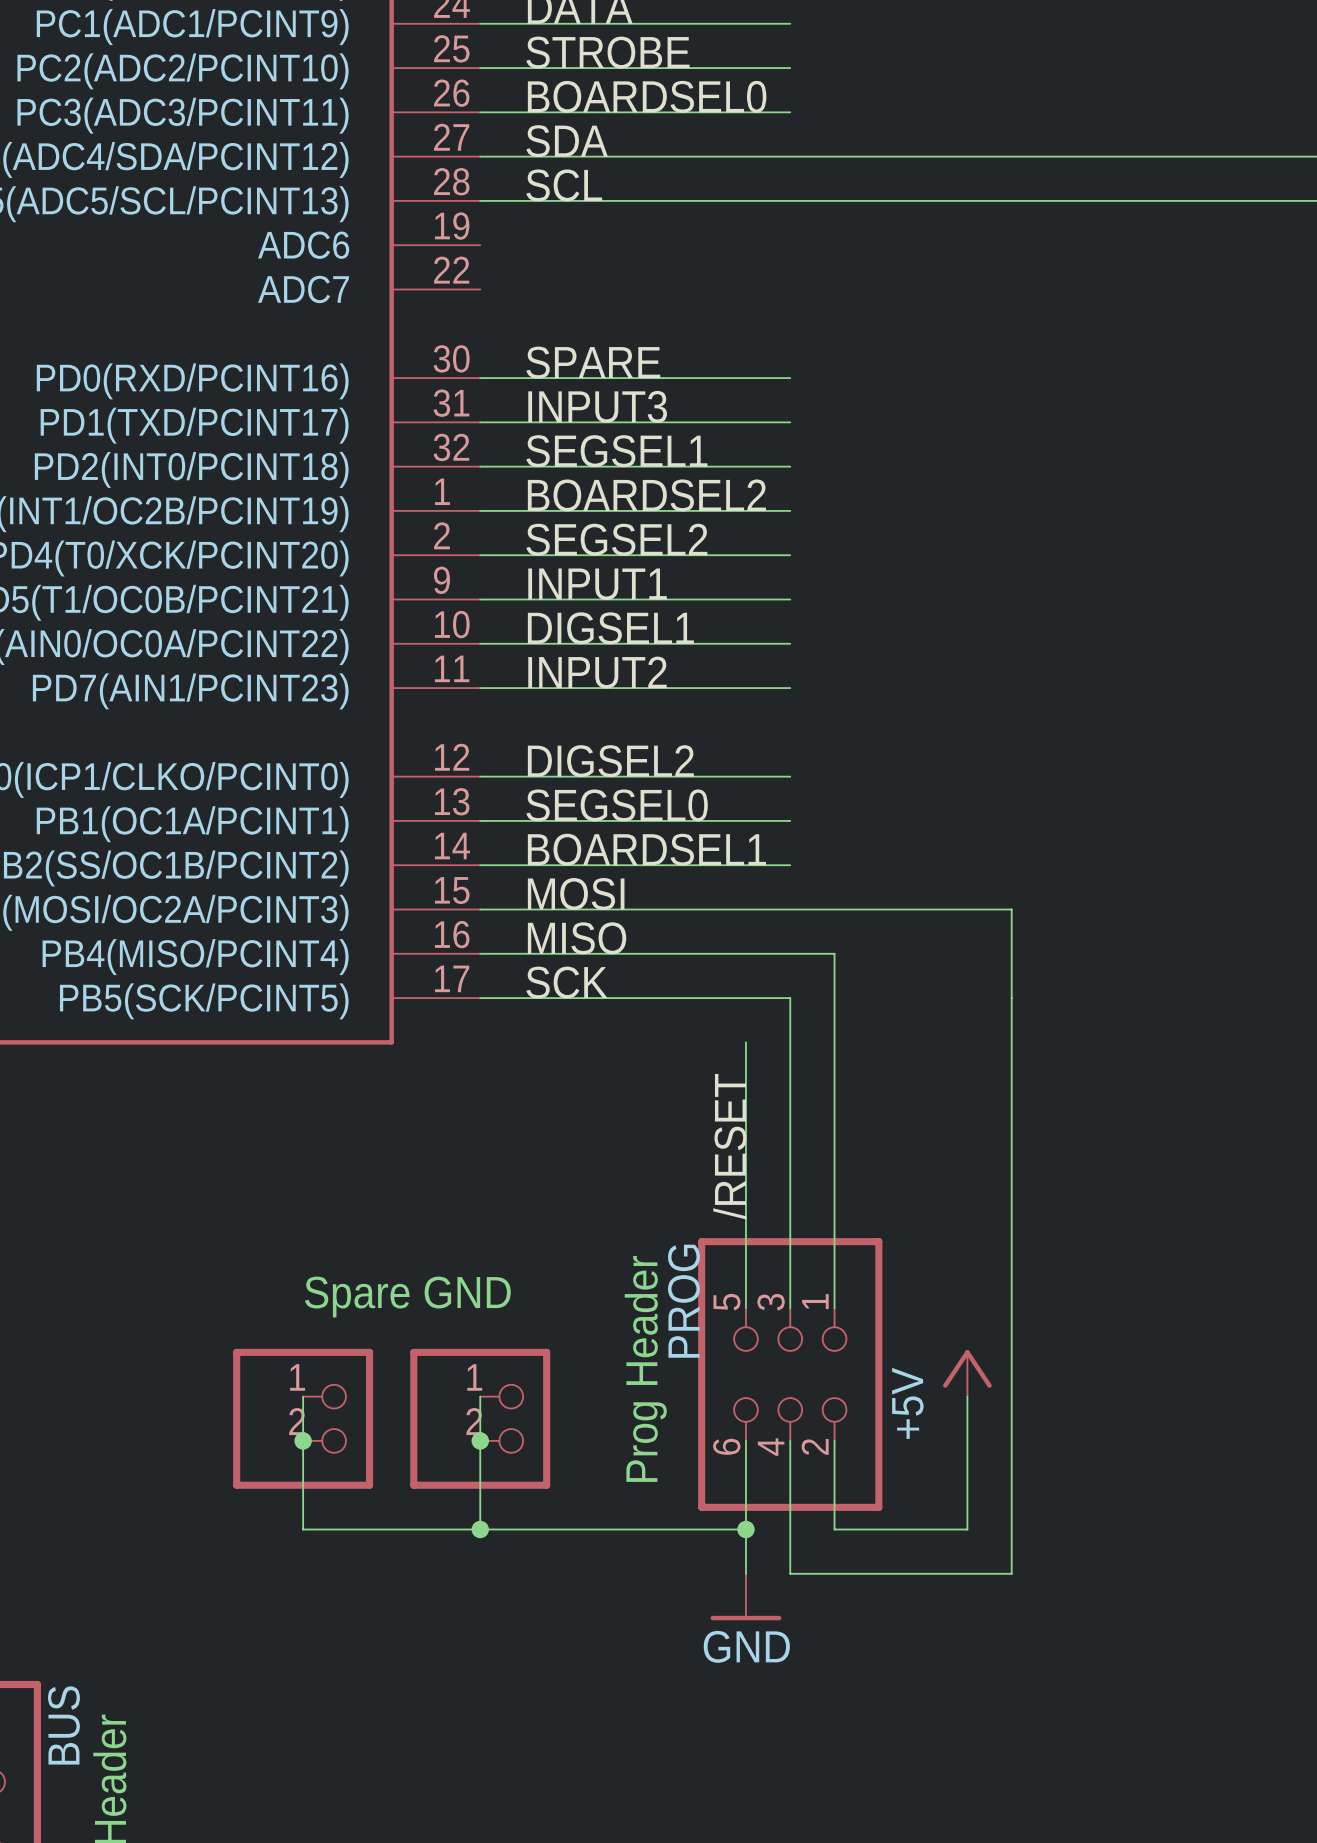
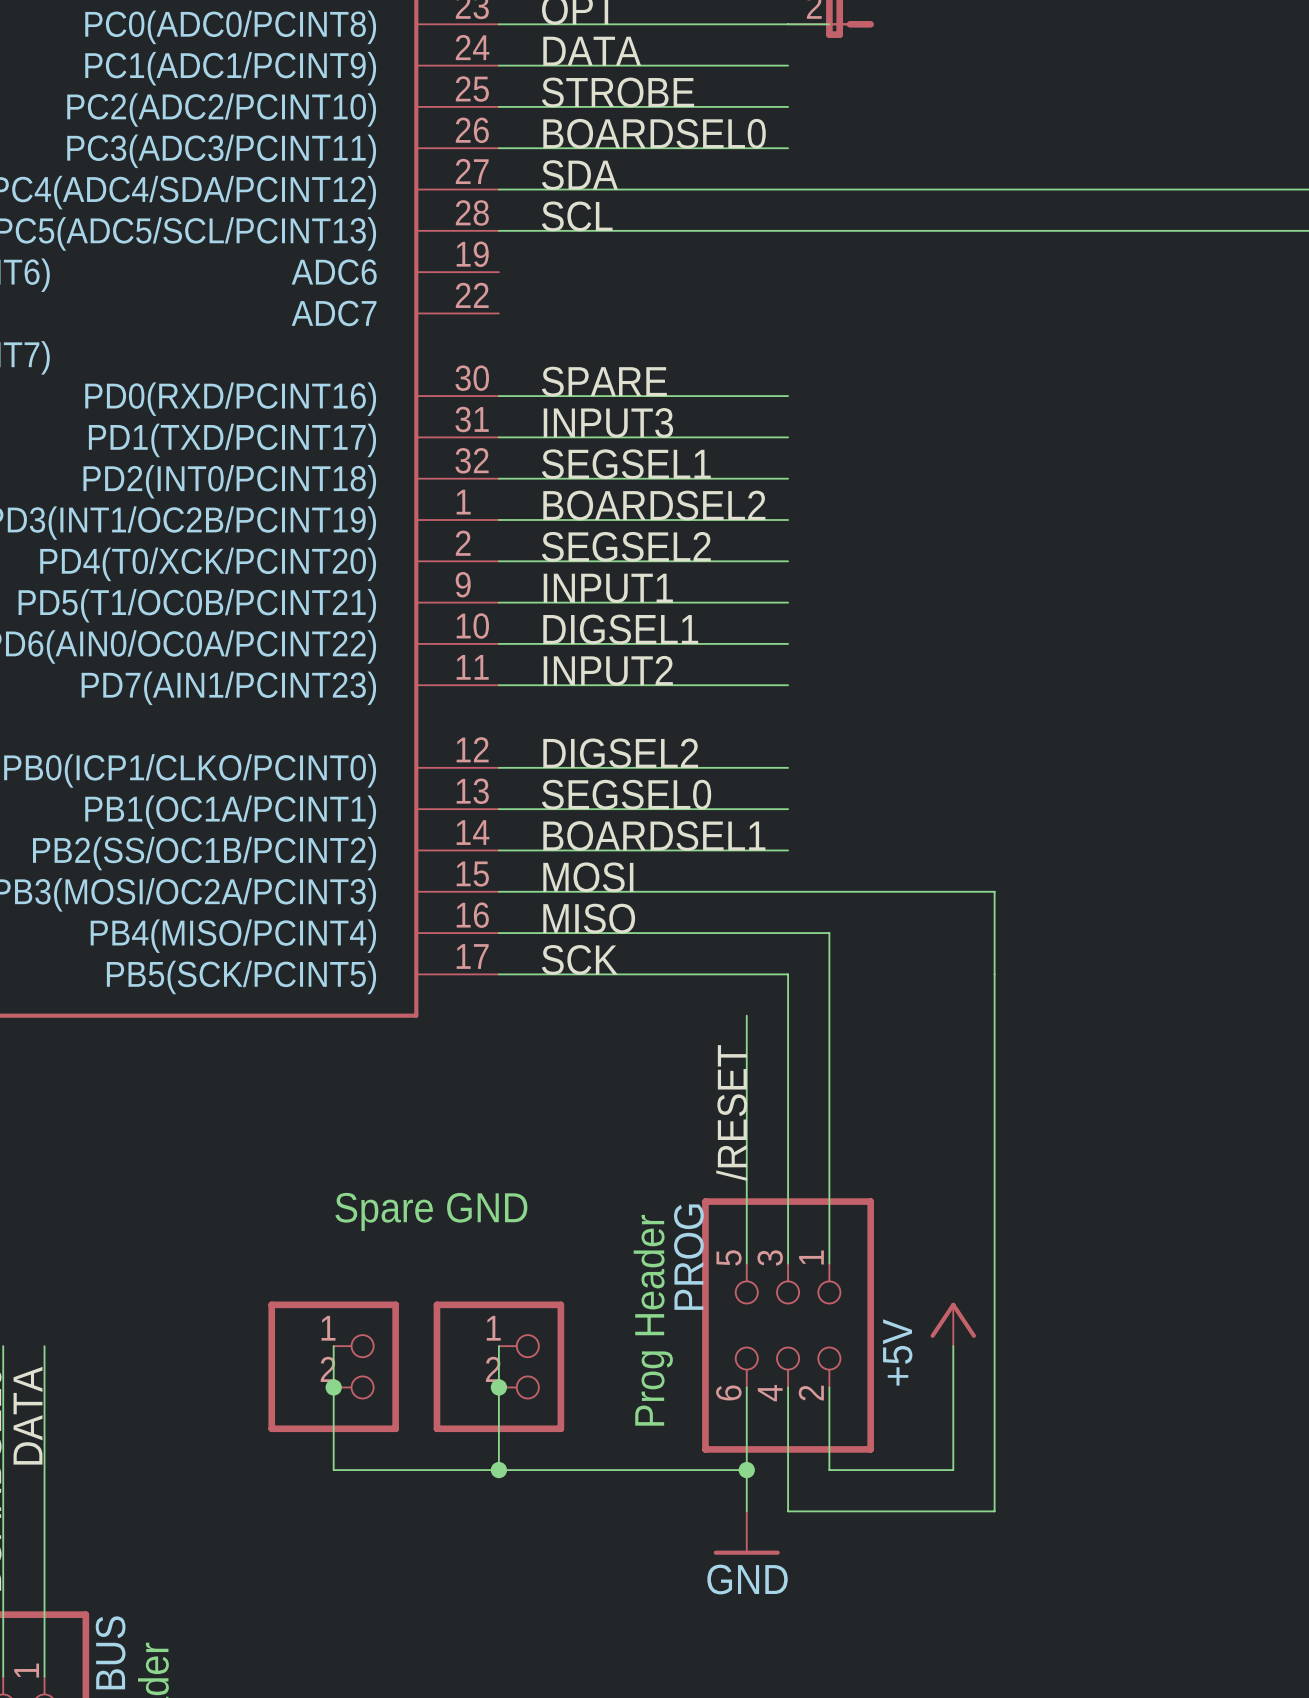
text position: Spare GND (407, 1297) -> Spare GND (431, 1211)

